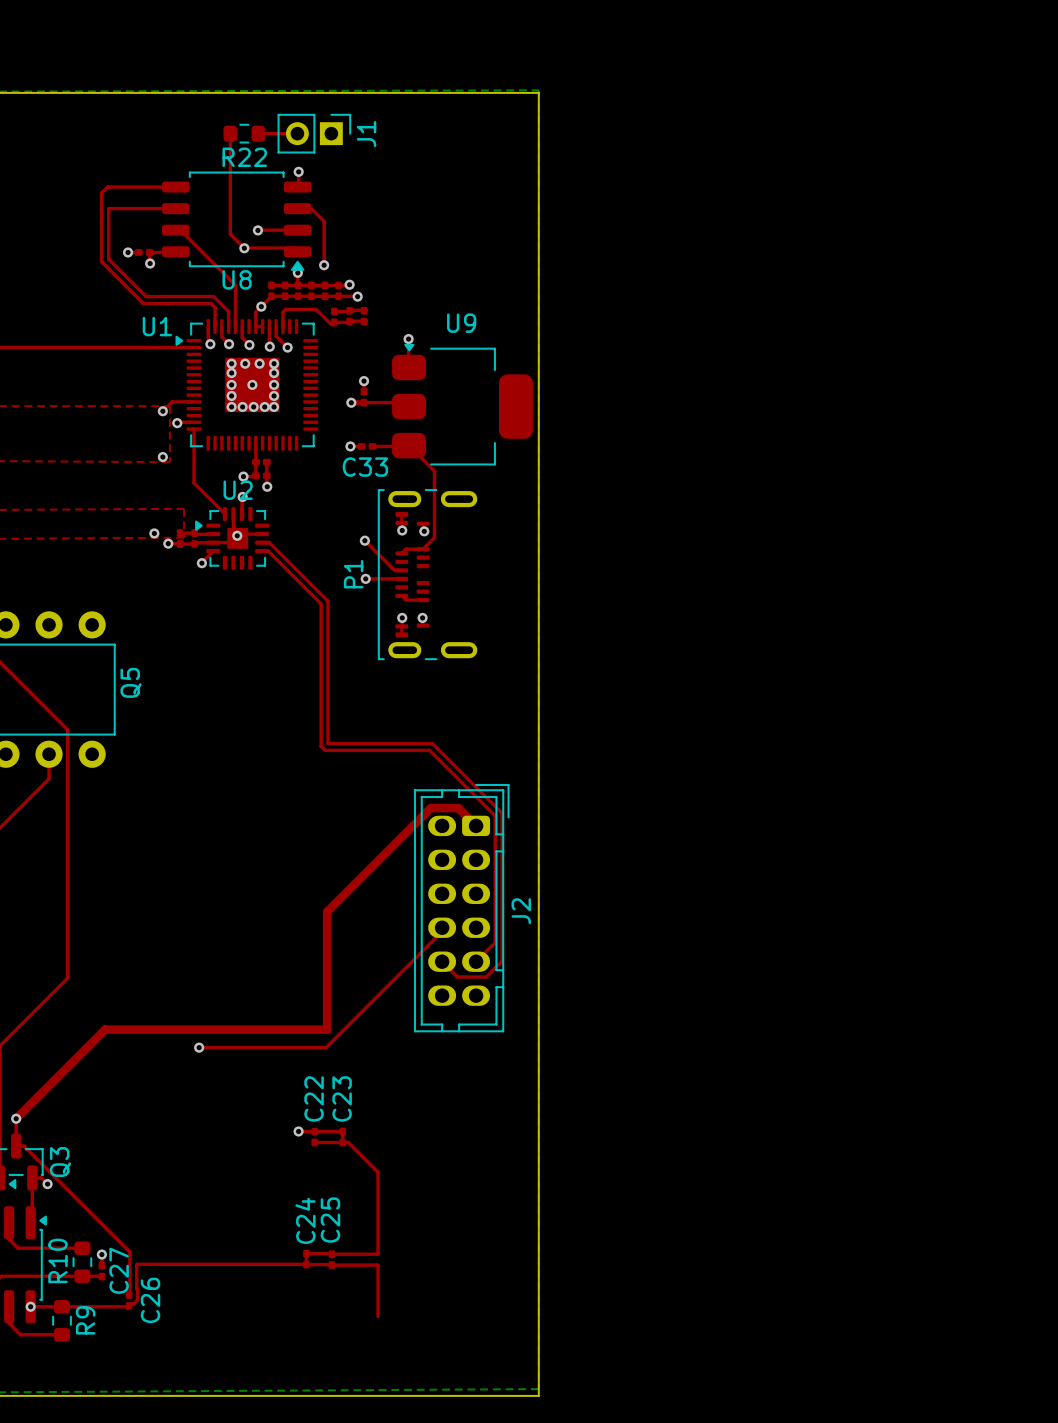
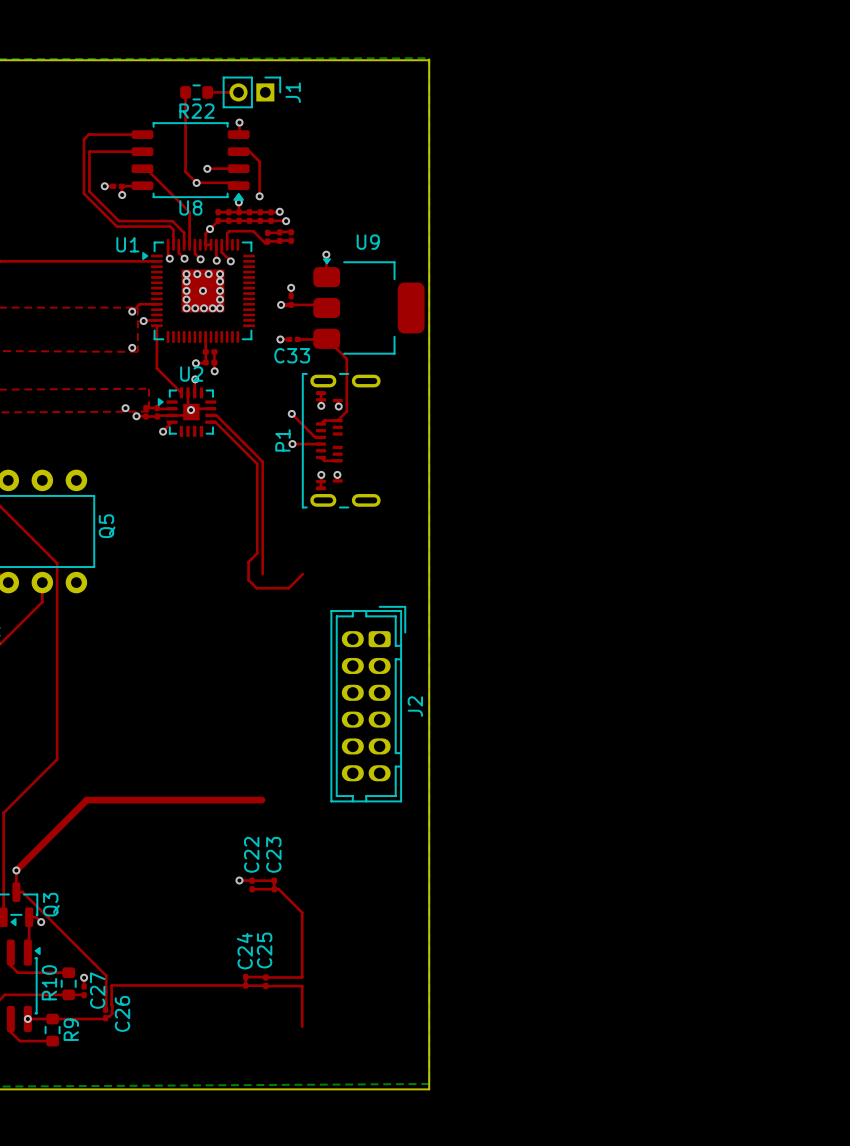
top track: (321, 717) (321, 746) (325, 750) (429, 750) (495, 815) (495, 942) (476, 961) -> (257, 553) (248, 562) (248, 579) (256, 588) (288, 588) (302, 574)
top track: (327, 743) (432, 743) (502, 813) (502, 961) (486, 977) (457, 977) (442, 961) -> none
top track: (476, 825) (458, 808) (430, 808) (327, 911) (327, 1029) -> none
top track: (442, 927) (442, 931) (326, 1047) (199, 1047) -> none
via: (199, 1047) -> none

